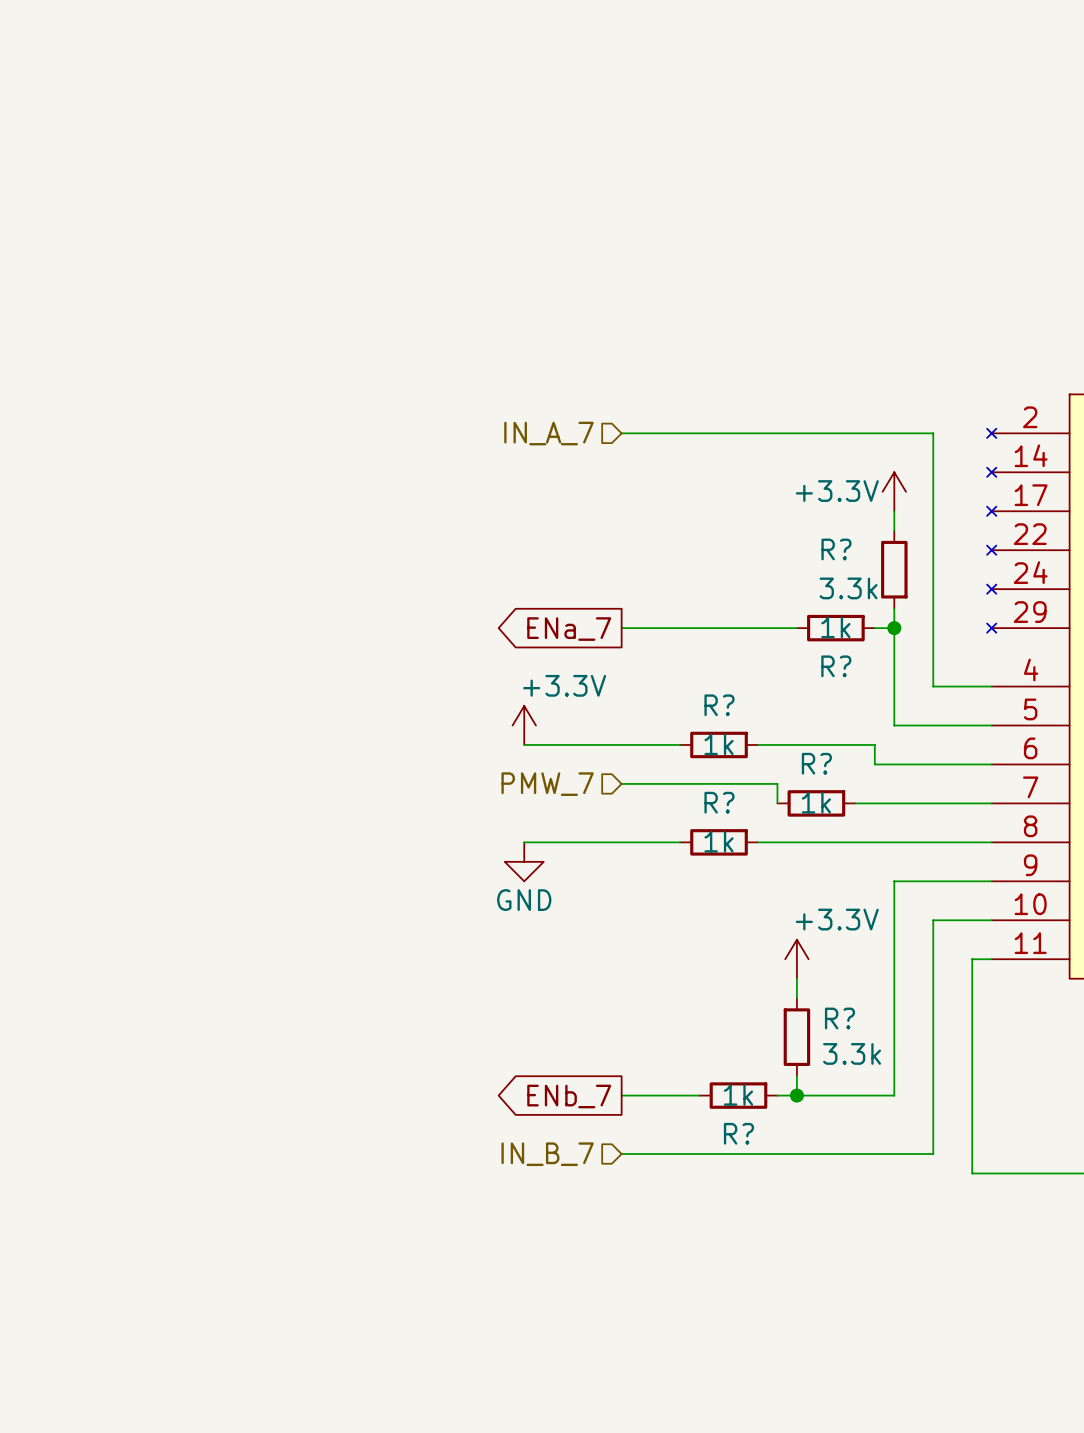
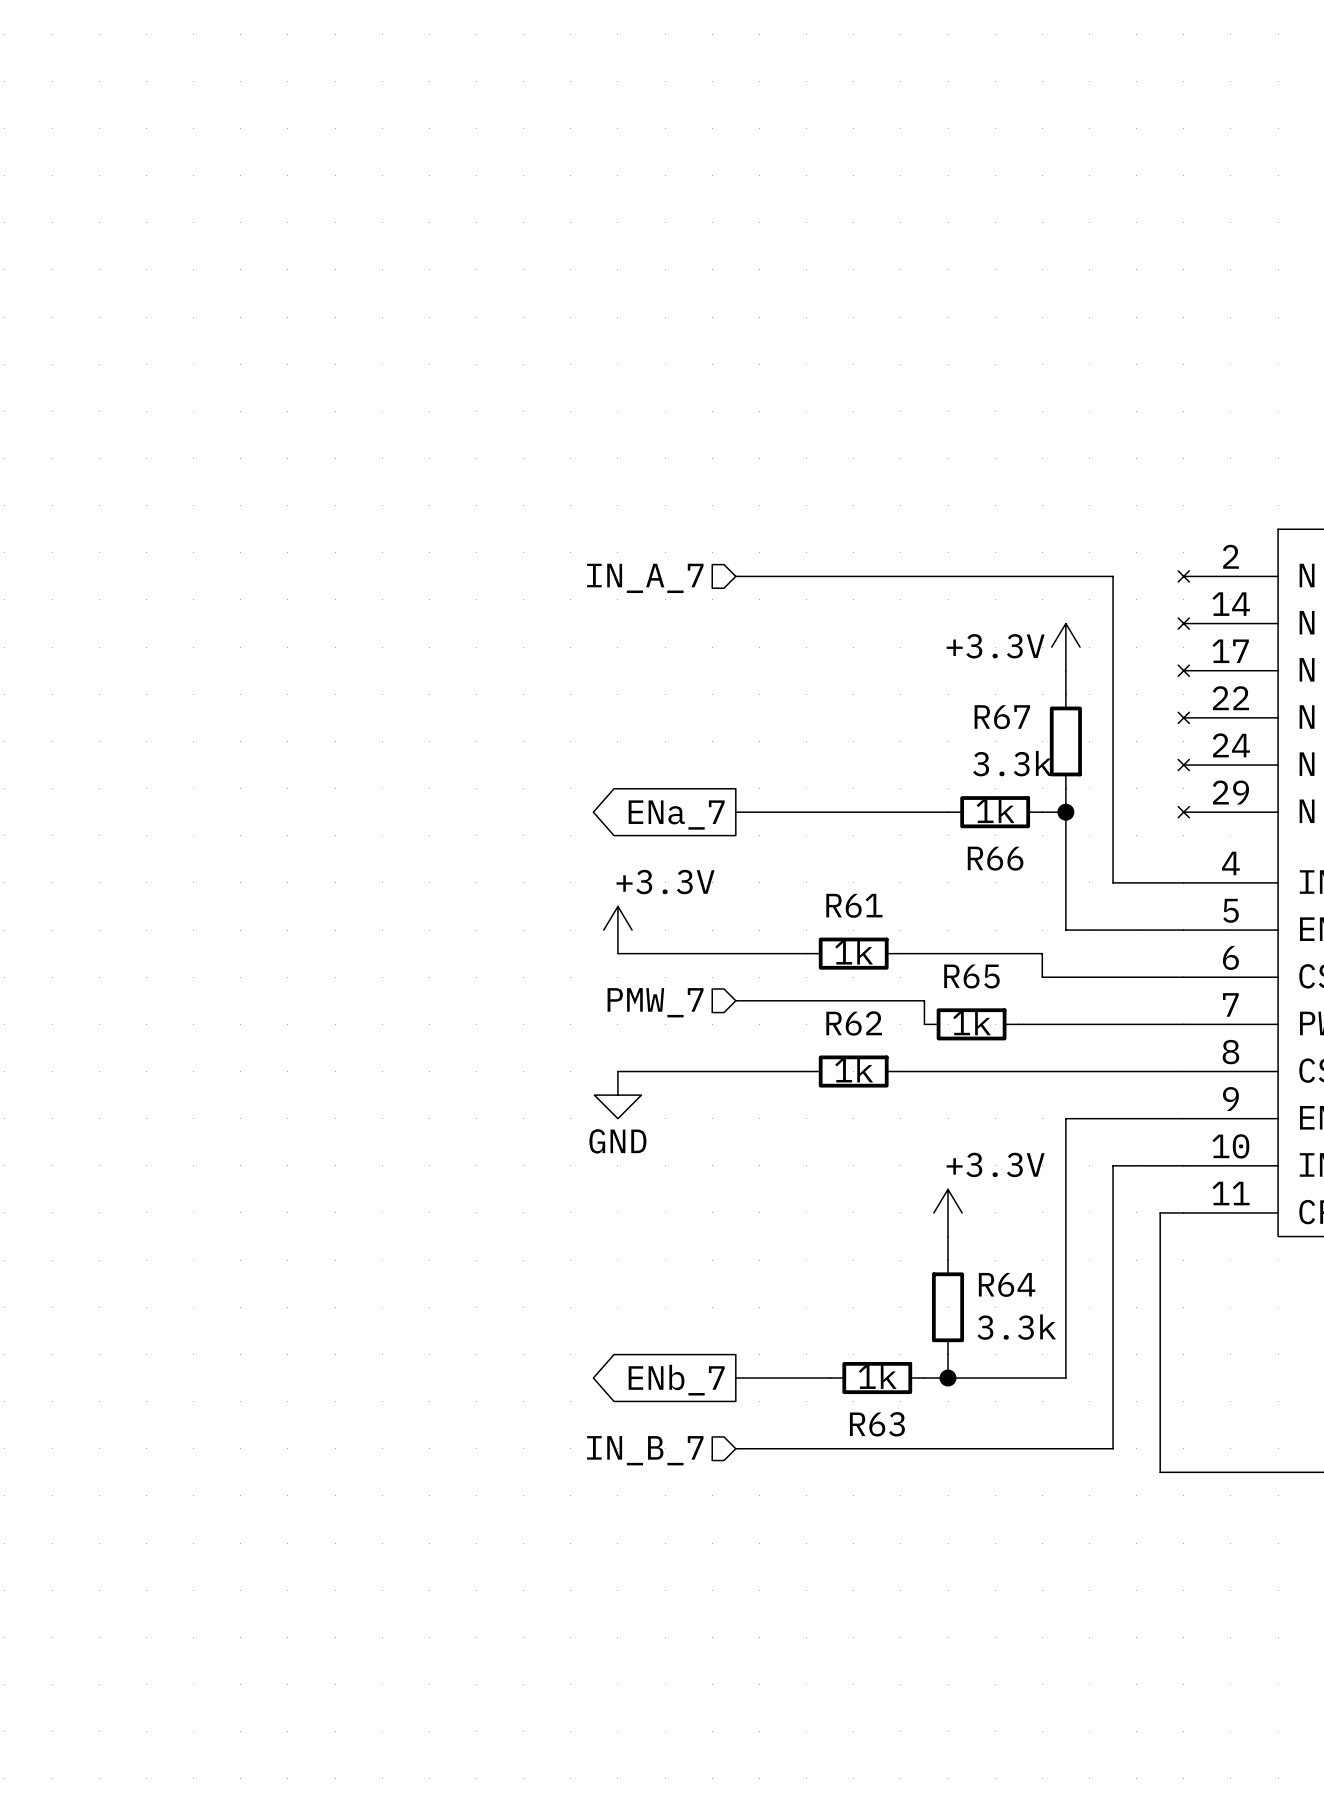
R? name: R? (836, 549) -> R67 (1002, 717)
R? name: R? (836, 666) -> R66 (995, 858)
R? name: R? (719, 705) -> R61 (854, 905)
R? name: R? (816, 763) -> R65 (971, 976)
R? name: R? (719, 802) -> R62 (854, 1023)
R? name: R? (840, 1018) -> R64 (1007, 1284)
R? name: R? (738, 1133) -> R63 (877, 1424)

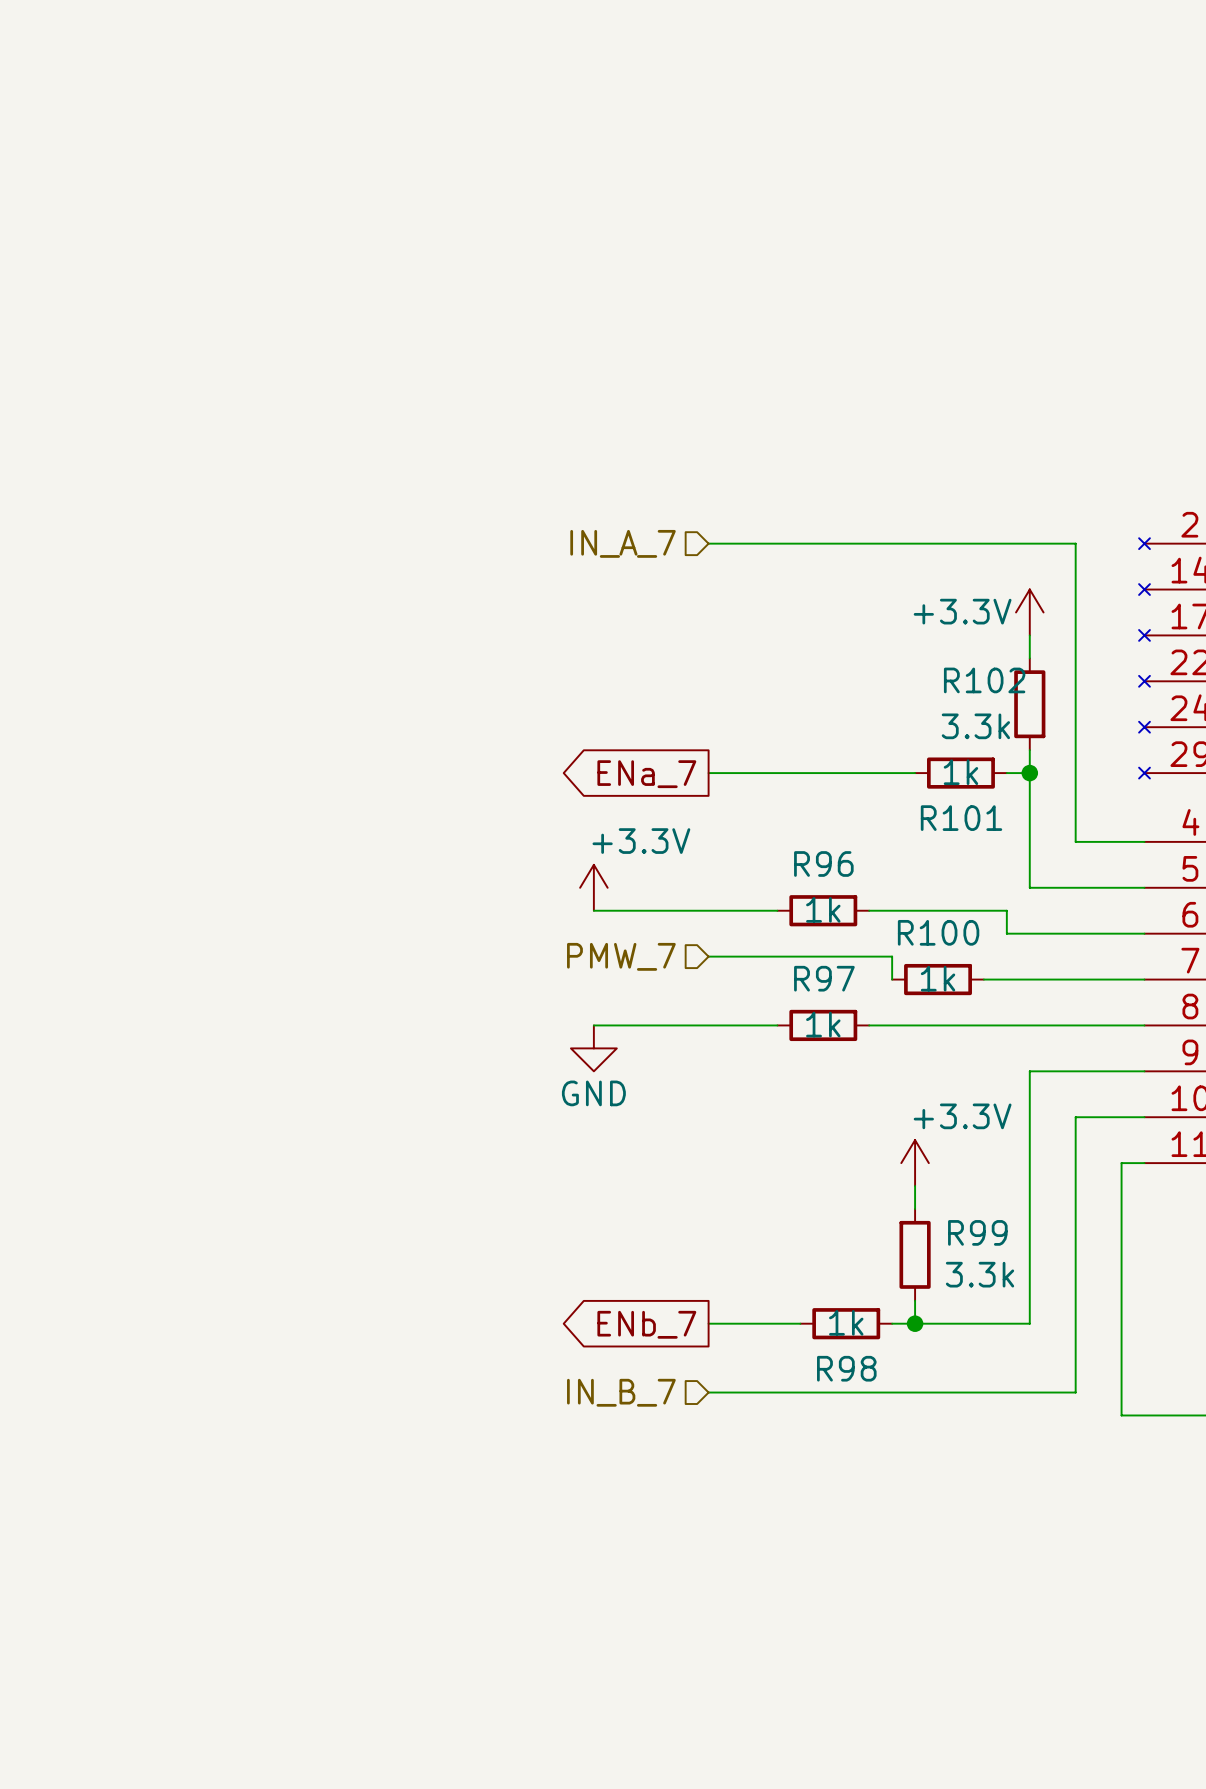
R67 name: R67 (1002, 717) -> R102 (984, 680)
R66 name: R66 (995, 858) -> R101 (961, 818)
R61 name: R61 (854, 905) -> R96 (823, 863)
R65 name: R65 (971, 976) -> R100 (938, 932)
R62 name: R62 (854, 1023) -> R97 (824, 978)
R64 name: R64 (1007, 1284) -> R99 (977, 1232)
R63 name: R63 (877, 1424) -> R98 (846, 1368)

